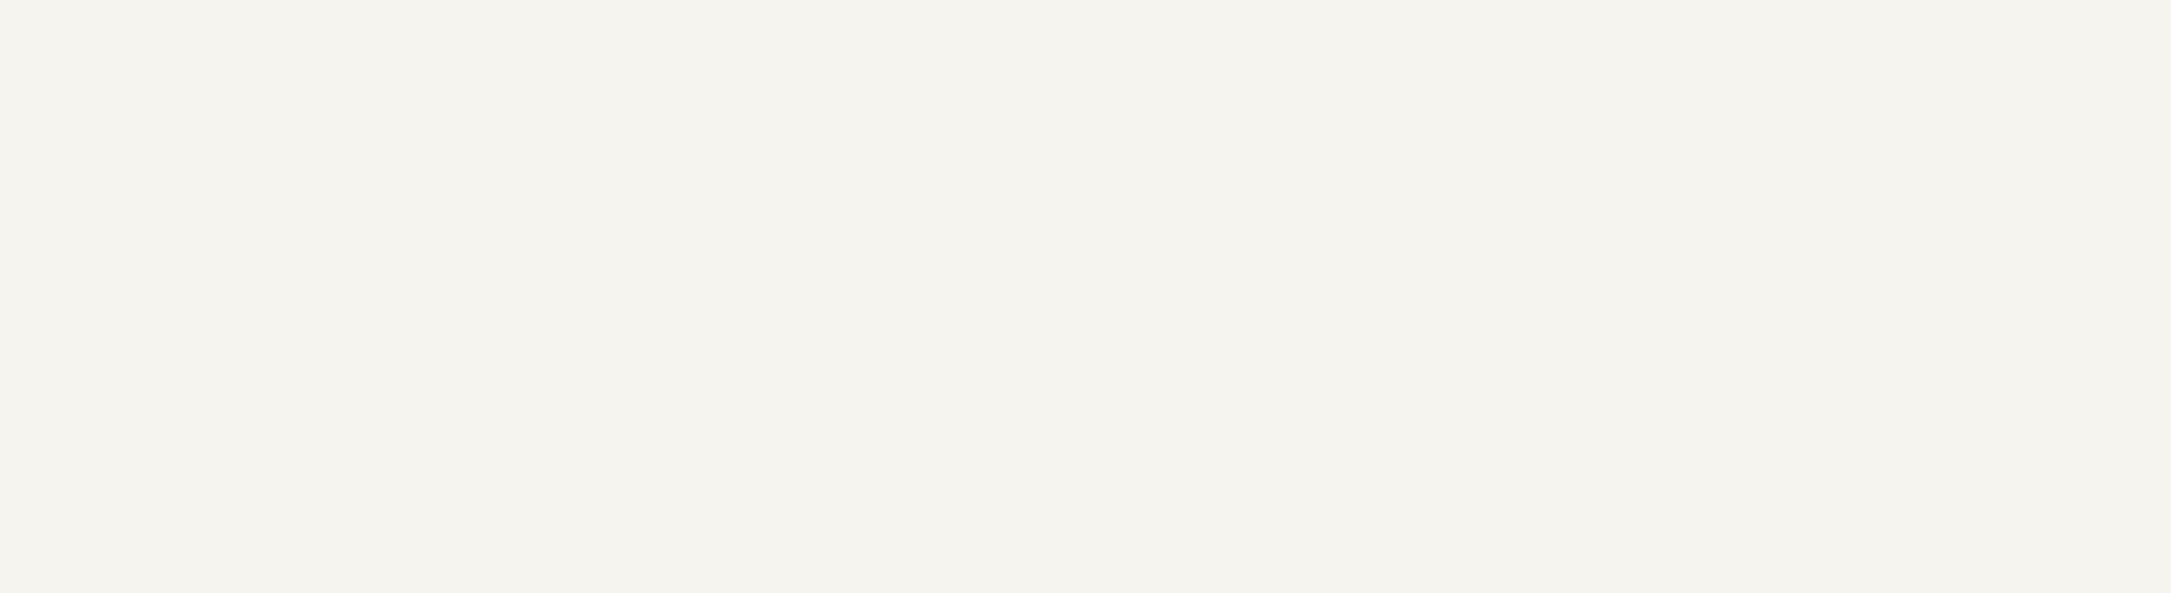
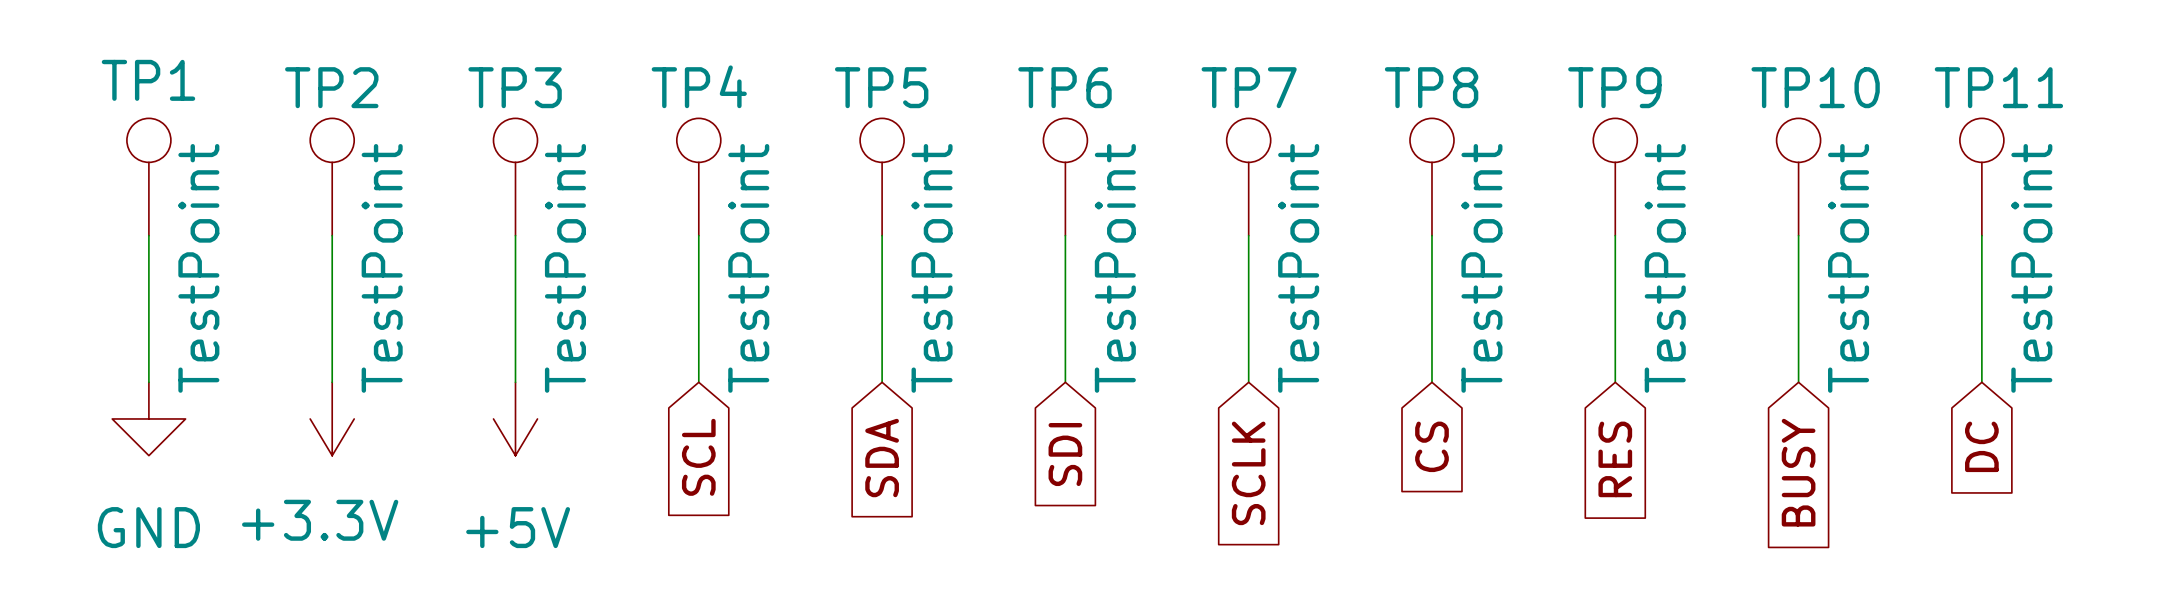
TP1: none -> TestPoint (148, 177)
TP2: none -> TestPoint (332, 177)
TP3: none -> TestPoint (515, 177)
TP4: none -> TestPoint (698, 177)
TP5: none -> TestPoint (882, 177)
TP6: none -> TestPoint (1065, 177)
TP7: none -> TestPoint (1248, 177)
TP8: none -> TestPoint (1431, 177)
TP9: none -> TestPoint (1615, 177)
TP10: none -> TestPoint (1798, 177)
TP11: none -> TestPoint (1981, 177)
wire: none -> (148, 235) (148, 382)
wire: none -> (332, 235) (332, 382)
wire: none -> (515, 235) (515, 382)
wire: none -> (698, 235) (698, 382)
wire: none -> (882, 235) (882, 382)
wire: none -> (1065, 235) (1065, 382)
wire: none -> (1248, 235) (1248, 382)
wire: none -> (1431, 235) (1431, 382)
wire: none -> (1615, 235) (1615, 382)
wire: none -> (1798, 235) (1798, 382)
wire: none -> (1981, 235) (1981, 382)
power symbol: none -> GND (148, 418)
power symbol: none -> +3.3V (332, 418)
power symbol: none -> +5V (515, 418)
global label: none -> CS (1431, 446)
global label: none -> DC (1981, 446)
global label: none -> SDI (1065, 454)
global label: none -> SCL (698, 457)
global label: none -> SDA (882, 458)
global label: none -> RES (1615, 459)
global label: none -> BUSY (1798, 472)
global label: none -> SCLK (1248, 473)

